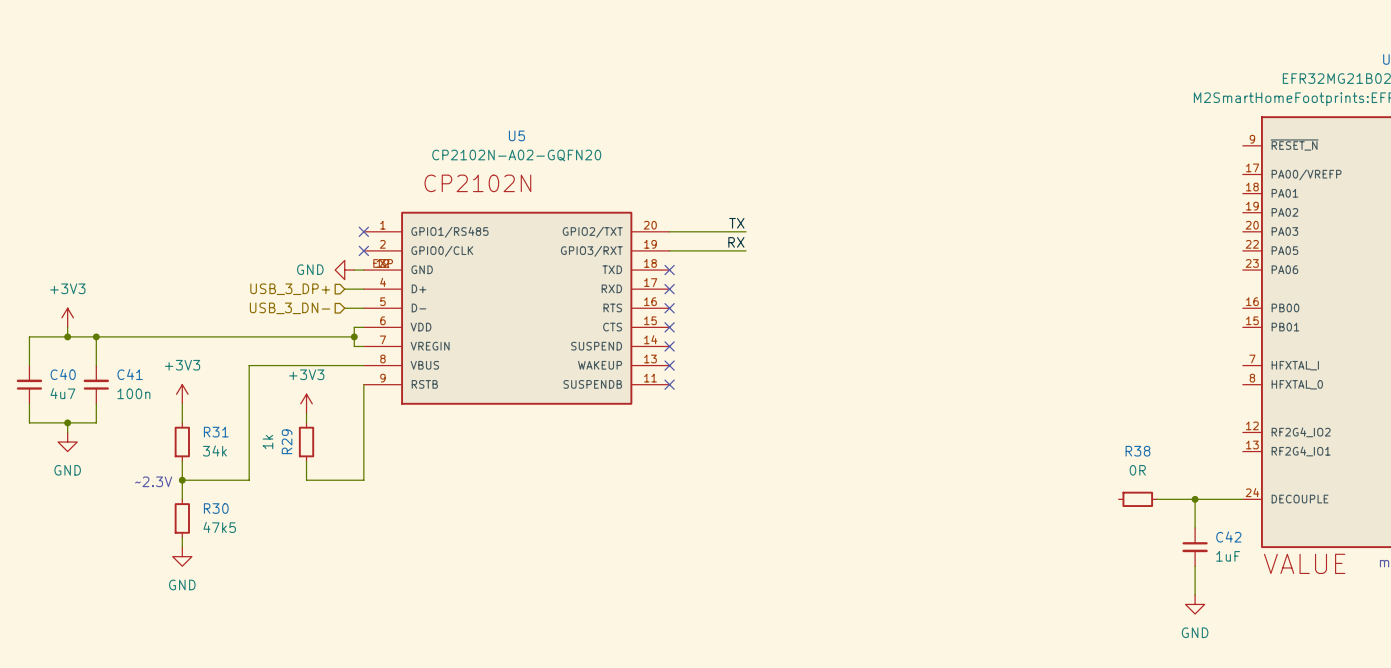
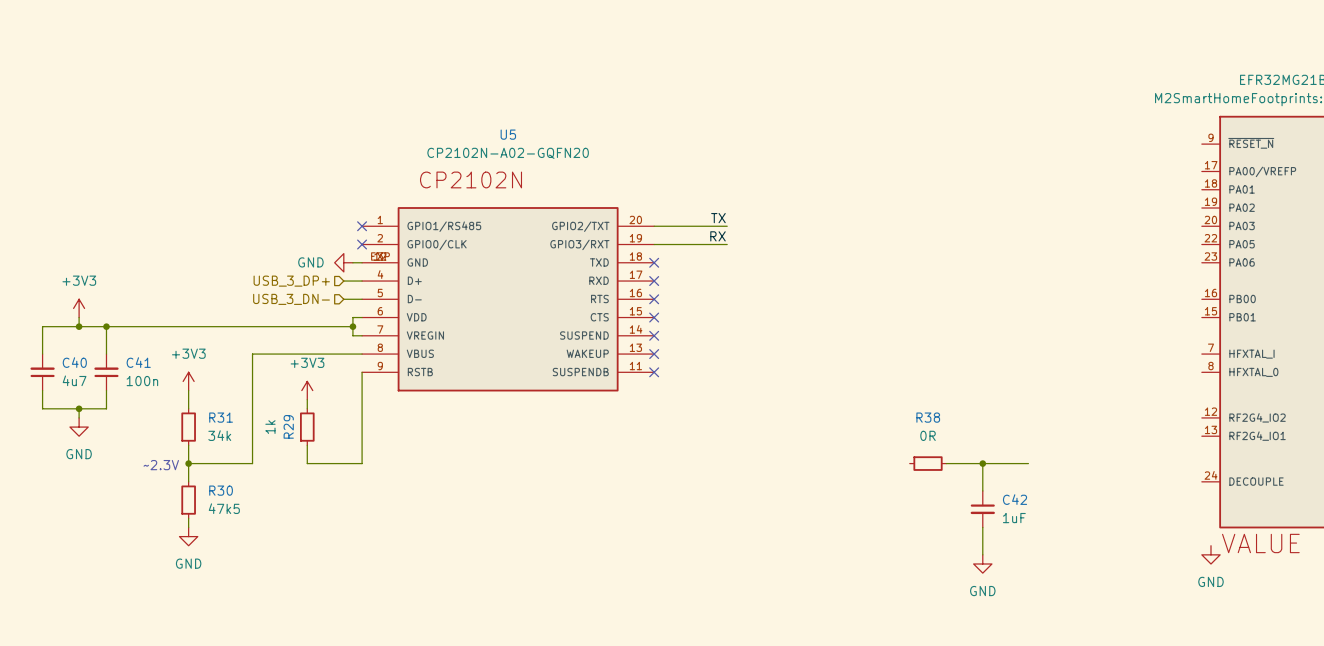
junction: none -> (982, 463)
R38 position: (1137, 499) -> (928, 463)
wire: (1156, 499) (1242, 499) -> (946, 463) (1028, 463)
wire: (1195, 499) (1195, 528) -> (982, 463) (982, 490)
junction: (1195, 499) -> none
C42 position: (1195, 547) -> (982, 509)
wire: (1195, 566) (1195, 594) -> (982, 527) (982, 554)
power symbol: none -> GND (982, 564)
power symbol position: GND (1195, 604) -> GND (1210, 554)

